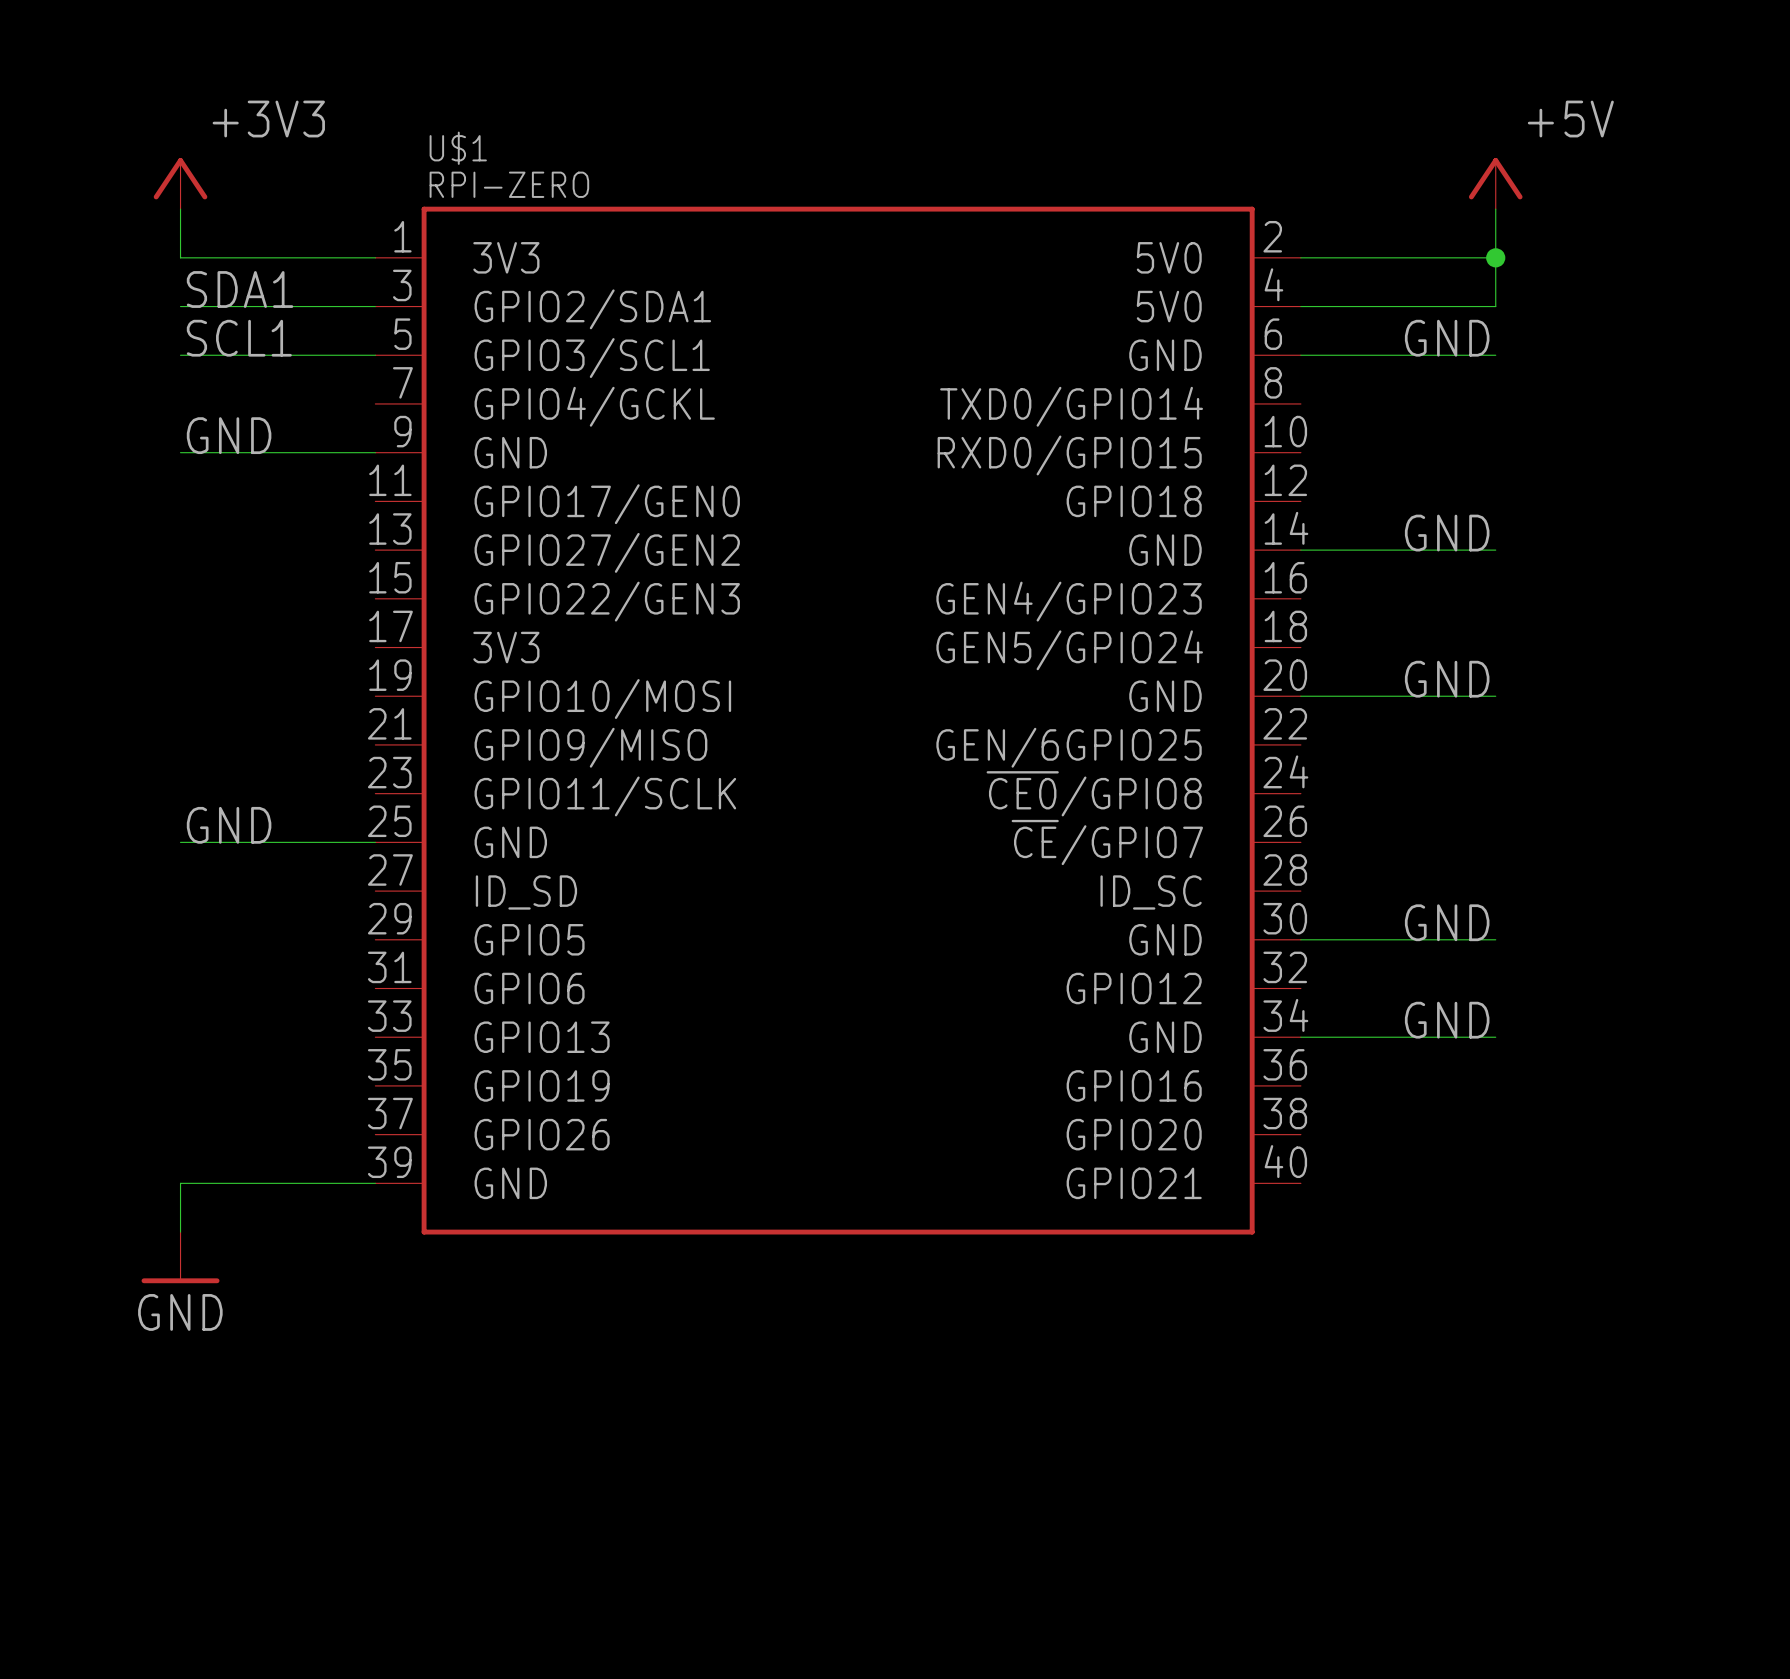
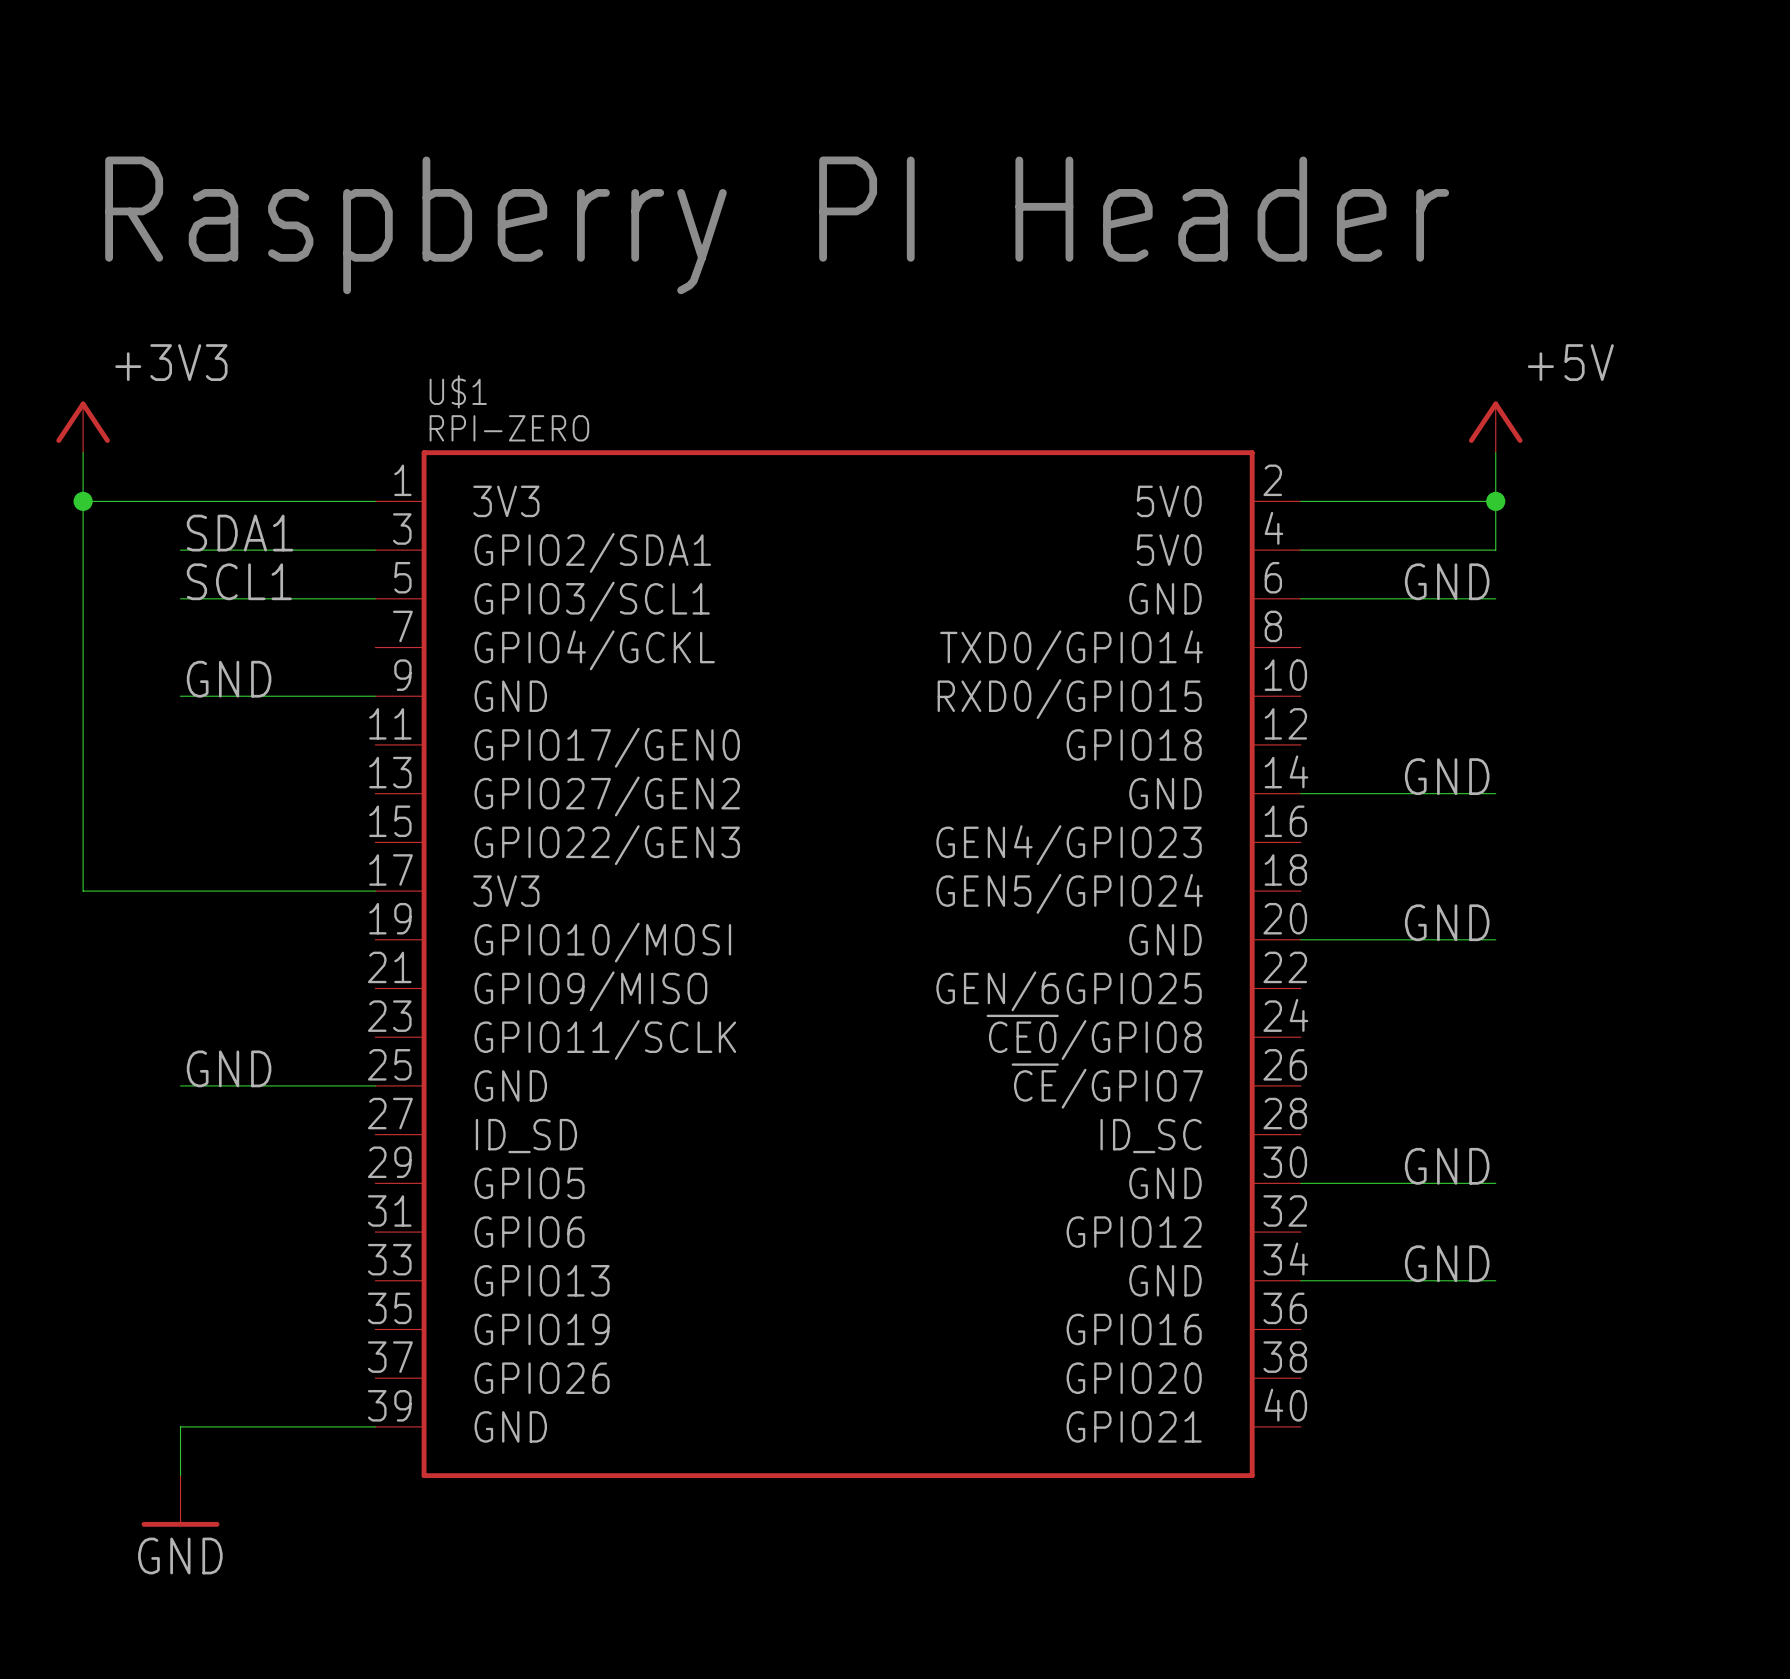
power symbol position: +3V3 (180, 183) -> +3V3 (83, 427)
power symbol position: +5V (1495, 183) -> +5V (1495, 427)
wire: (180, 209) (180, 257) (375, 257) -> none
wire: (1495, 209) (1495, 306) (1300, 306) -> none
text: none -> Raspberry PI Header (777, 225)
wire: (1300, 257) (1495, 257) -> (1300, 501) (1495, 501)
junction: (1495, 257) -> none
label position: SDA1 (240, 289) -> SDA1 (240, 533)
wire: (180, 306) (375, 306) -> (180, 550) (375, 550)
label position: SCL1 (239, 338) -> SCL1 (239, 581)
label: GND (1447, 338) -> none
wire: (180, 355) (375, 355) -> (180, 598) (375, 598)
wire: (1300, 355) (1495, 355) -> (1300, 598) (1495, 598)
label: GND (229, 435) -> none
wire: none -> (83, 452) (83, 891) (375, 891)
wire: (180, 452) (375, 452) -> (180, 696) (375, 696)
wire: none -> (1495, 452) (1495, 550)
wire: none -> (83, 501) (375, 501)
junction: none -> (83, 501)
junction: none -> (1495, 501)
label position: GND (1447, 533) -> GND (1447, 581)
label: none -> GND (229, 679)
label: GND (1447, 679) -> none
wire: (1300, 696) (1495, 696) -> (1300, 793) (1495, 793)
U$1 position: (838, 720) -> (838, 964)
label: none -> GND (1447, 776)
label: GND (229, 825) -> none
wire: (180, 842) (375, 842) -> (180, 1085) (375, 1085)
label: GND (1447, 1020) -> none
wire: (1300, 1037) (1495, 1037) -> (1300, 1280) (1495, 1280)
label: none -> GND (229, 1068)
label: none -> GND (1447, 1166)
wire: (375, 1183) (180, 1183) (180, 1232) -> (375, 1426) (180, 1426) (180, 1475)
wire: none -> (1300, 1183) (1495, 1183)
power symbol position: GND (180, 1257) -> GND (180, 1501)
label: none -> GND (1447, 1263)

